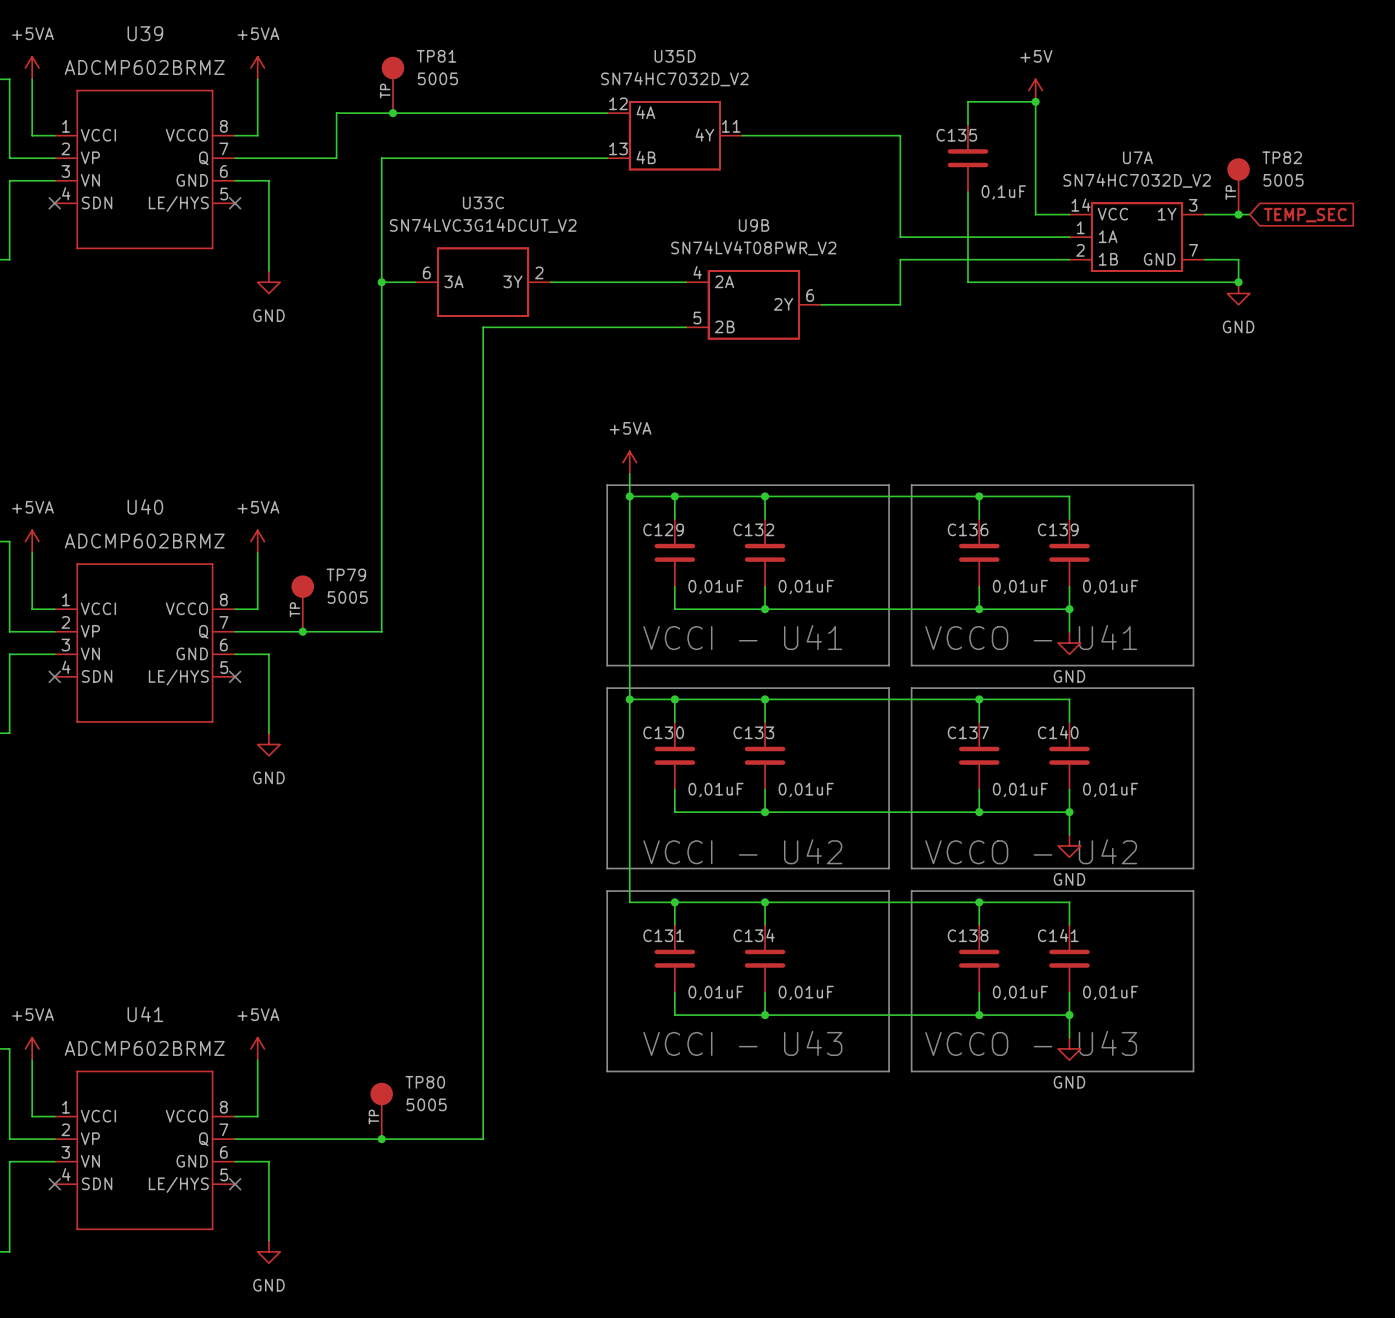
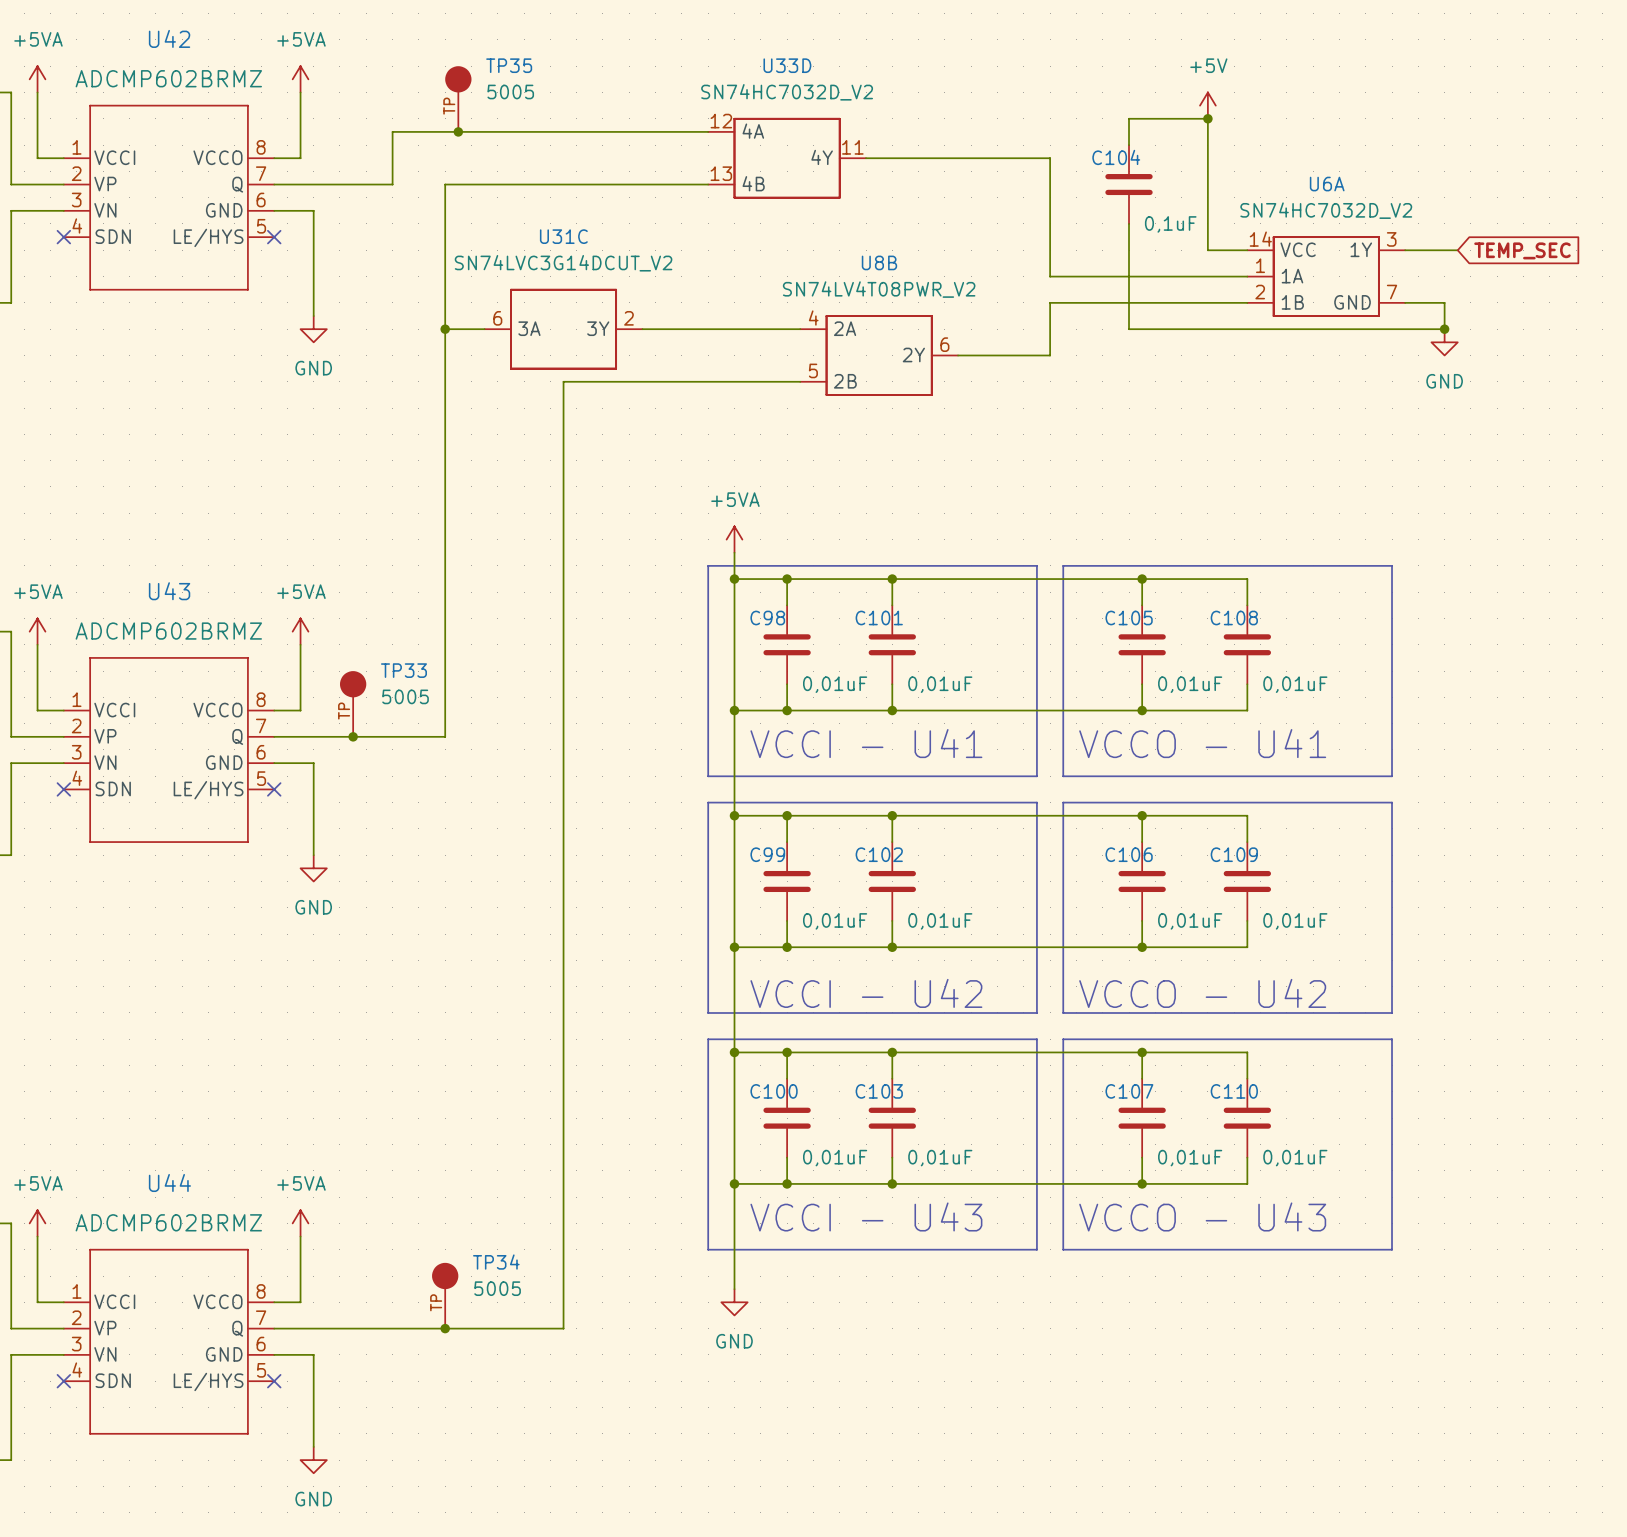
U39 name: U39 (145, 33) -> U42 (169, 38)
TP81 name: TP81 (436, 56) -> TP35 (509, 65)
U35D name: U35D (675, 56) -> U33D (787, 65)
C135 name: C135 (956, 135) -> C104 (1116, 157)
U7A name: U7A (1137, 157) -> U6A (1327, 184)
TP82: 5005 (1238, 186) -> none
U33C name: U33C (483, 202) -> U31C (563, 236)
junction: (1238, 214) -> none
U9B name: U9B (754, 225) -> U8B (879, 262)
U40 name: U40 (145, 506) -> U43 (169, 591)
C129 name: C129 (663, 529) -> C98 (767, 618)
C132 name: C132 (753, 529) -> C101 (879, 618)
C136 name: C136 (968, 529) -> C105 (1129, 618)
C139 name: C139 (1058, 529) -> C108 (1234, 618)
TP79 name: TP79 (346, 574) -> TP33 (403, 670)
wire: none -> (734, 710) (787, 710)
junction: none -> (734, 710)
junction: none -> (787, 710)
wire: (1069, 609) (1069, 631) -> none
junction: (1069, 609) -> none
power symbol: GND (1069, 643) -> none
C130 name: C130 (663, 732) -> C99 (767, 854)
C133 name: C133 (753, 732) -> C102 (879, 854)
C137 name: C137 (968, 732) -> C106 (1129, 854)
C140 name: C140 (1058, 732) -> C109 (1234, 854)
wire: none -> (734, 947) (787, 947)
junction: none -> (734, 947)
junction: none -> (787, 947)
wire: (1069, 812) (1069, 834) -> none
junction: (1069, 812) -> none
power symbol: GND (1069, 845) -> none
wire: none -> (734, 1052) (734, 1289)
junction: none -> (734, 1052)
C131 name: C131 (663, 935) -> C100 (774, 1091)
C134 name: C134 (754, 935) -> C103 (879, 1091)
C138 name: C138 (968, 935) -> C107 (1129, 1091)
C141 name: C141 (1058, 935) -> C110 (1234, 1091)
U41 name: U41 (145, 1014) -> U44 (169, 1182)
wire: none -> (734, 1183) (787, 1183)
junction: none -> (734, 1183)
junction: none -> (787, 1183)
wire: (1069, 1015) (1069, 1037) -> none
junction: (1069, 1015) -> none
power symbol: GND (1069, 1048) -> none
TP80 name: TP80 (425, 1082) -> TP34 (496, 1262)
power symbol: none -> GND (734, 1302)

